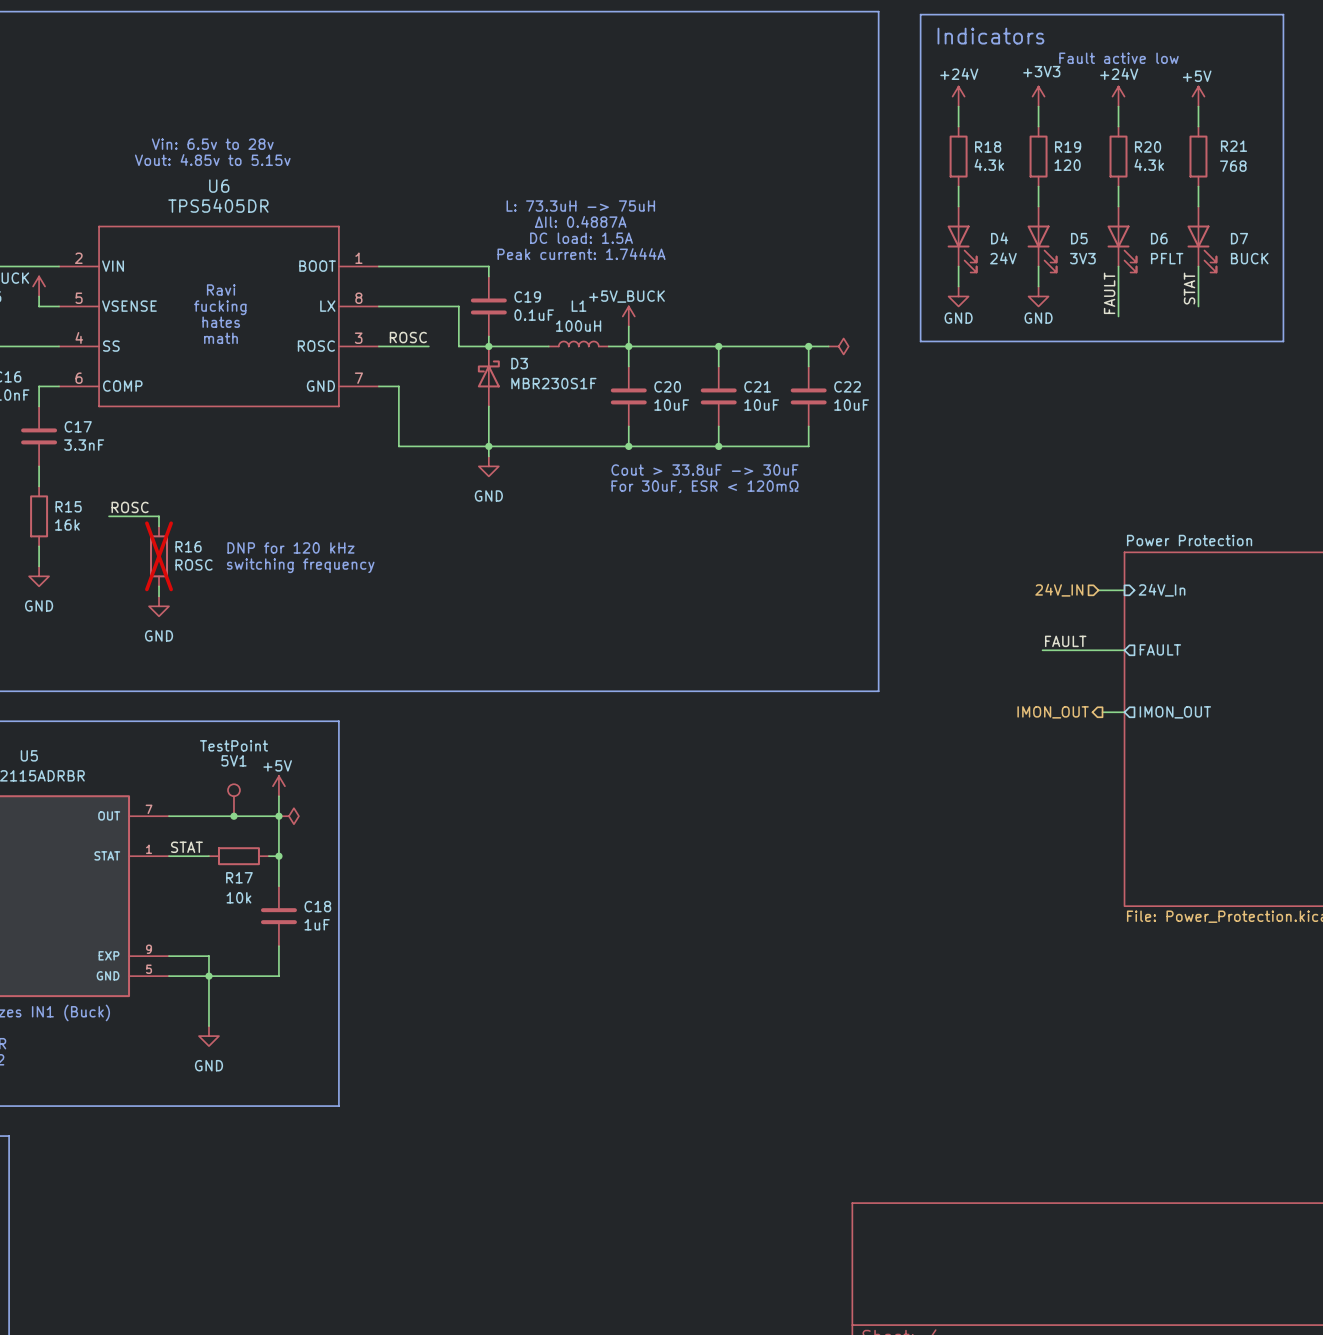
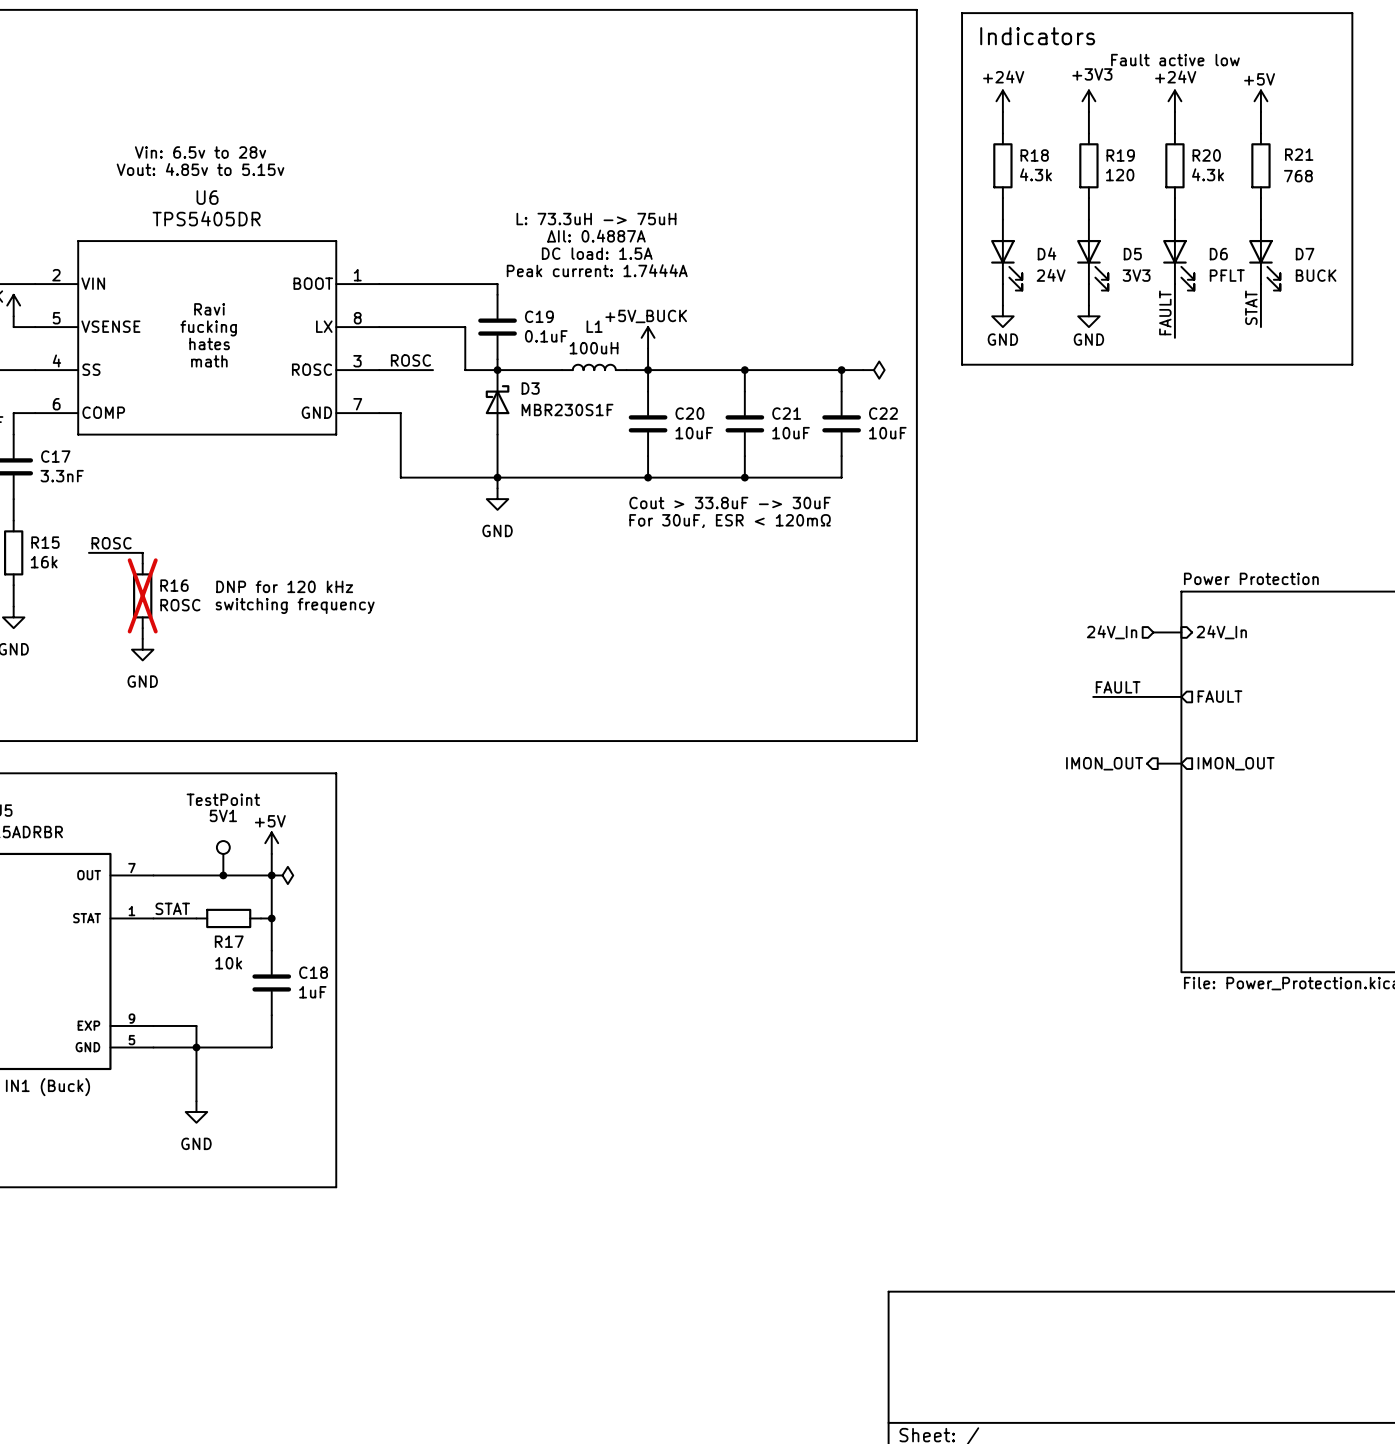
hierarchical label: 24V_IN (1059, 590) -> 24V_In (1112, 632)

